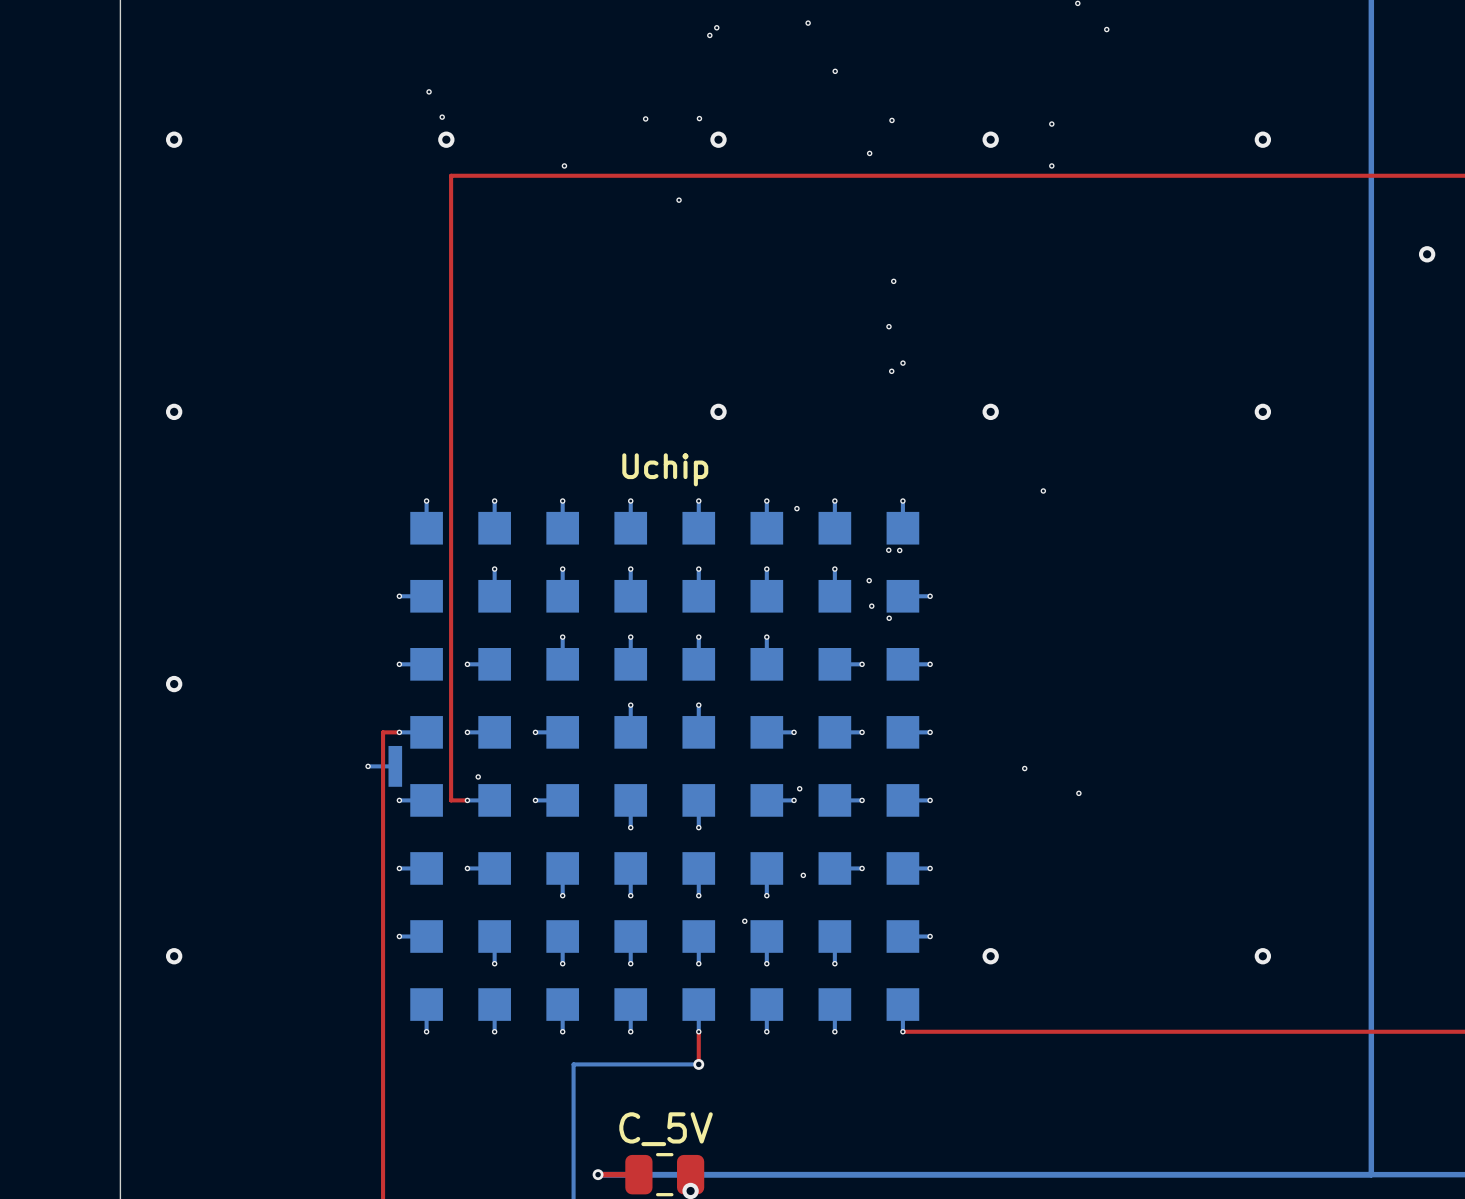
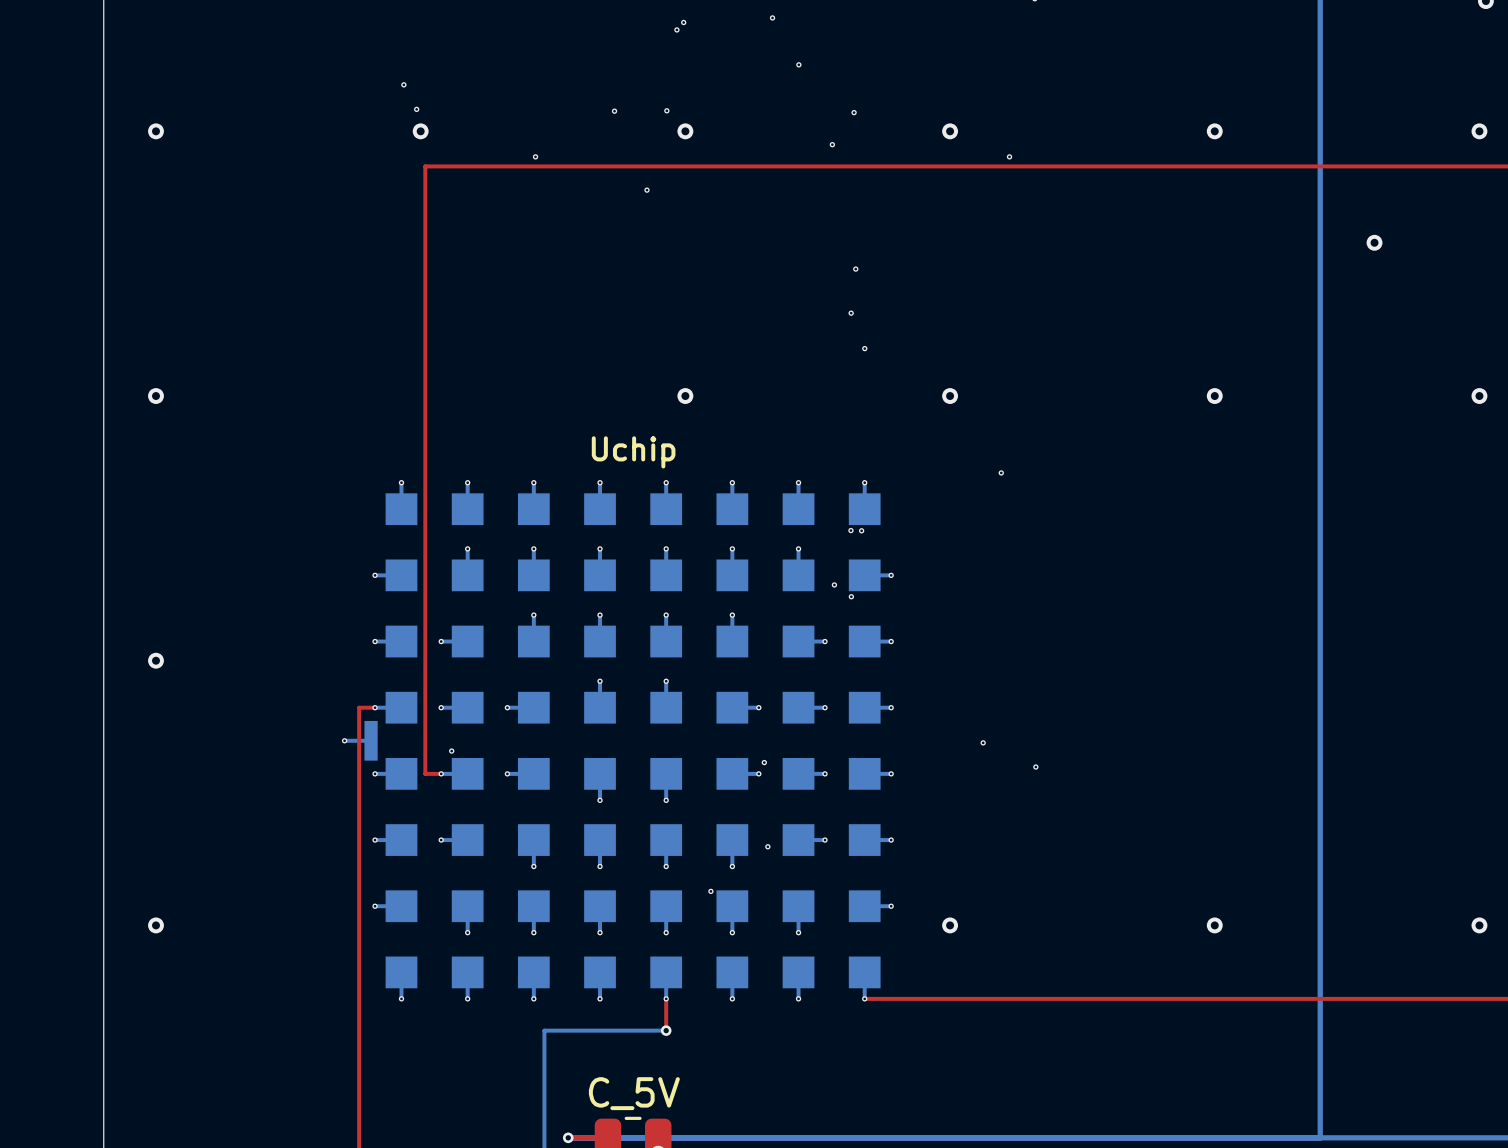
via: (1106, 29) -> none
via: (1051, 124) -> none
via: (891, 371) -> none
via: (796, 508) -> none
via: (869, 580) -> none

